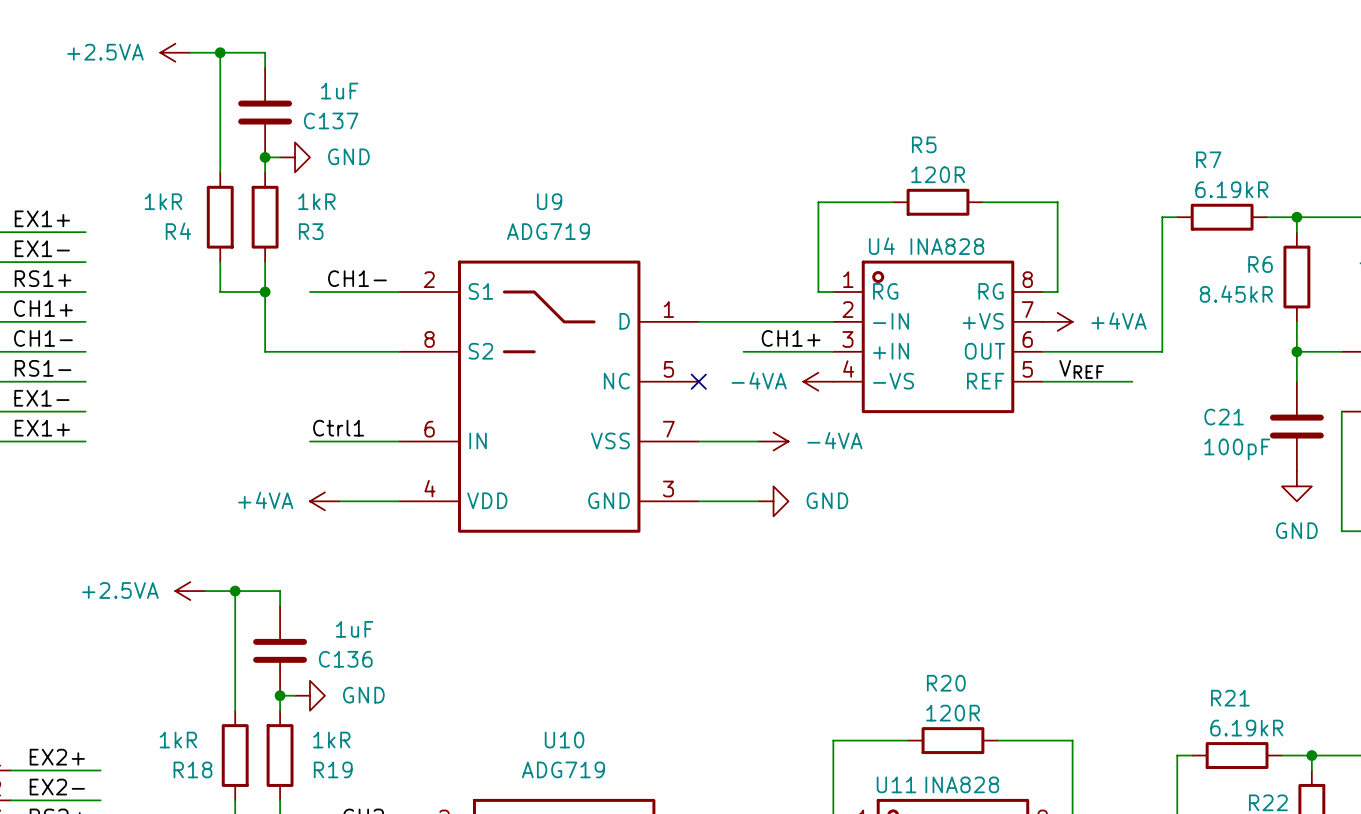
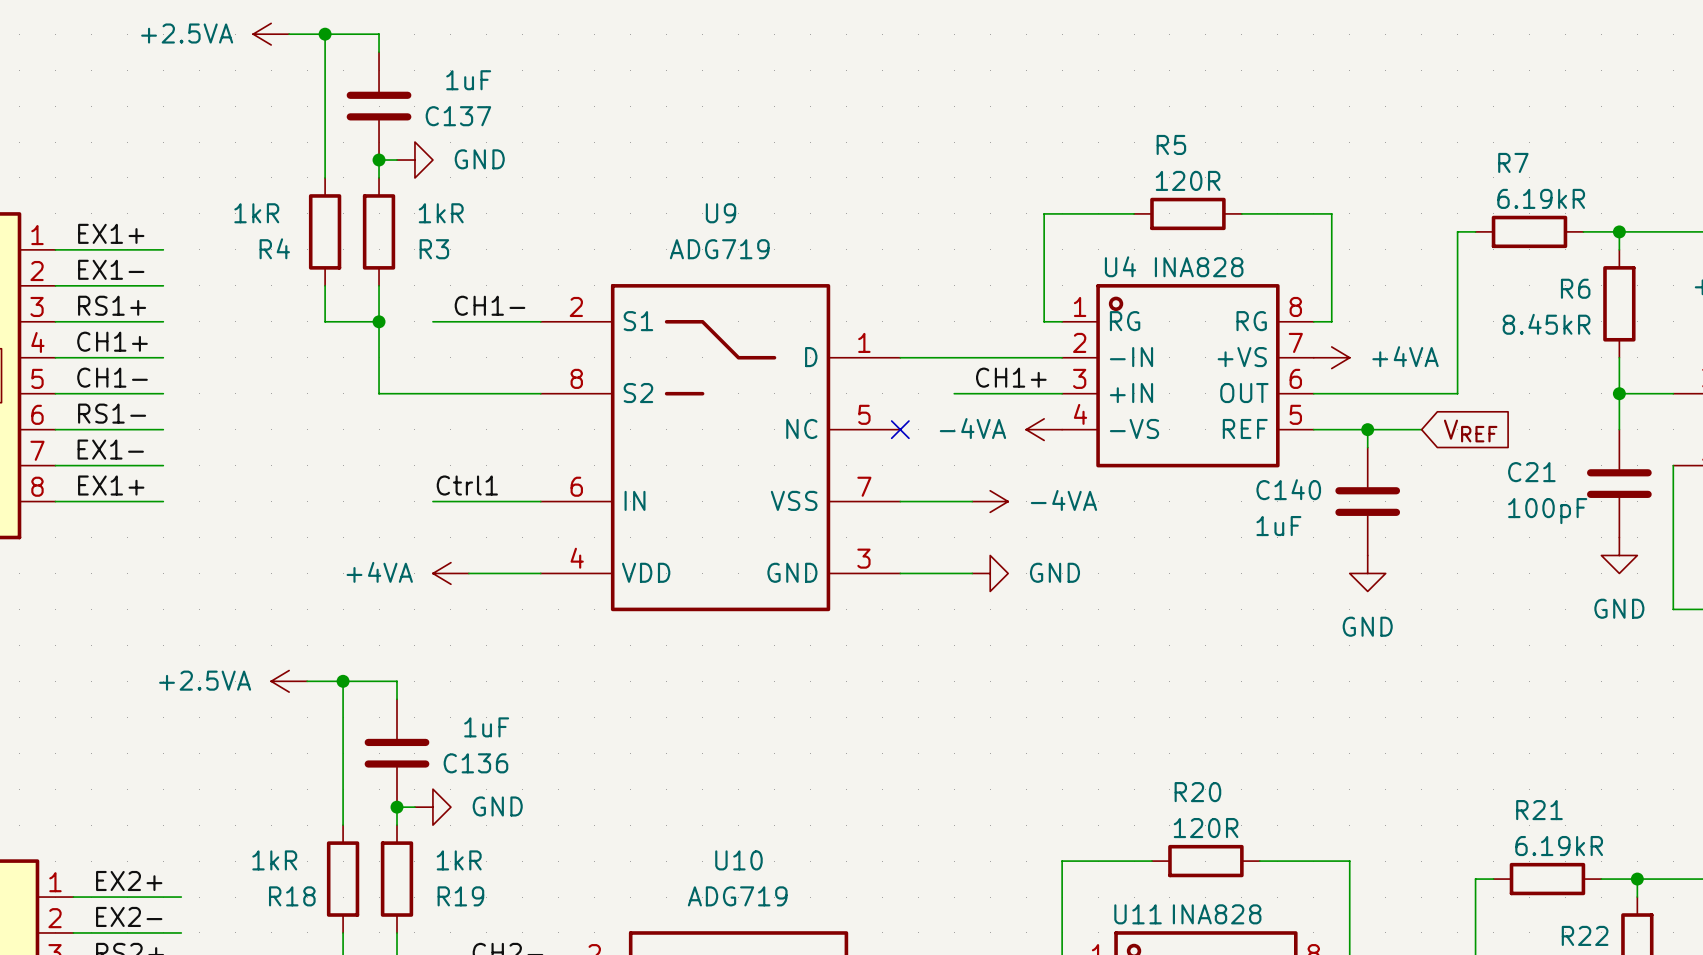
label: VREF (1081, 369) -> none
wire: none -> (1367, 429) (1367, 447)
junction: none -> (1367, 429)
global label: none -> VREF (1470, 431)
C140: none -> 1uF (1367, 501)
power symbol: none -> GND (1367, 573)

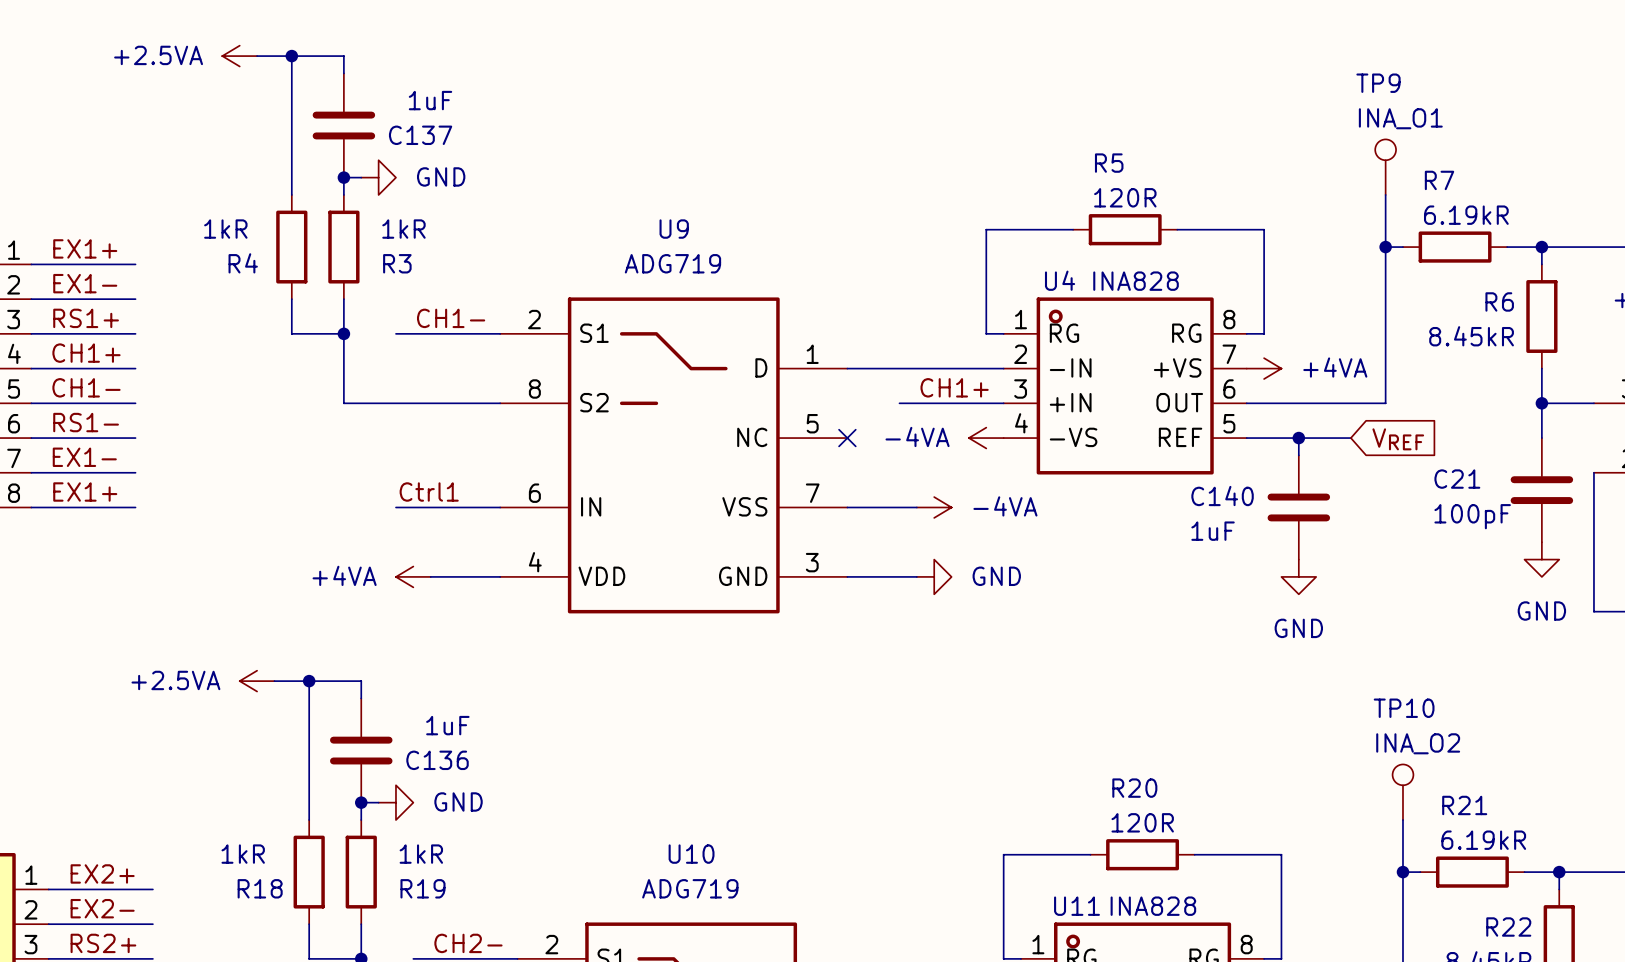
TP9: none -> INA_O1 (1385, 167)
wire: none -> (1385, 194) (1385, 247)
junction: none -> (1385, 247)
TP10: none -> INA_O2 (1402, 792)
wire: none -> (1402, 820) (1402, 872)
junction: none -> (1402, 872)

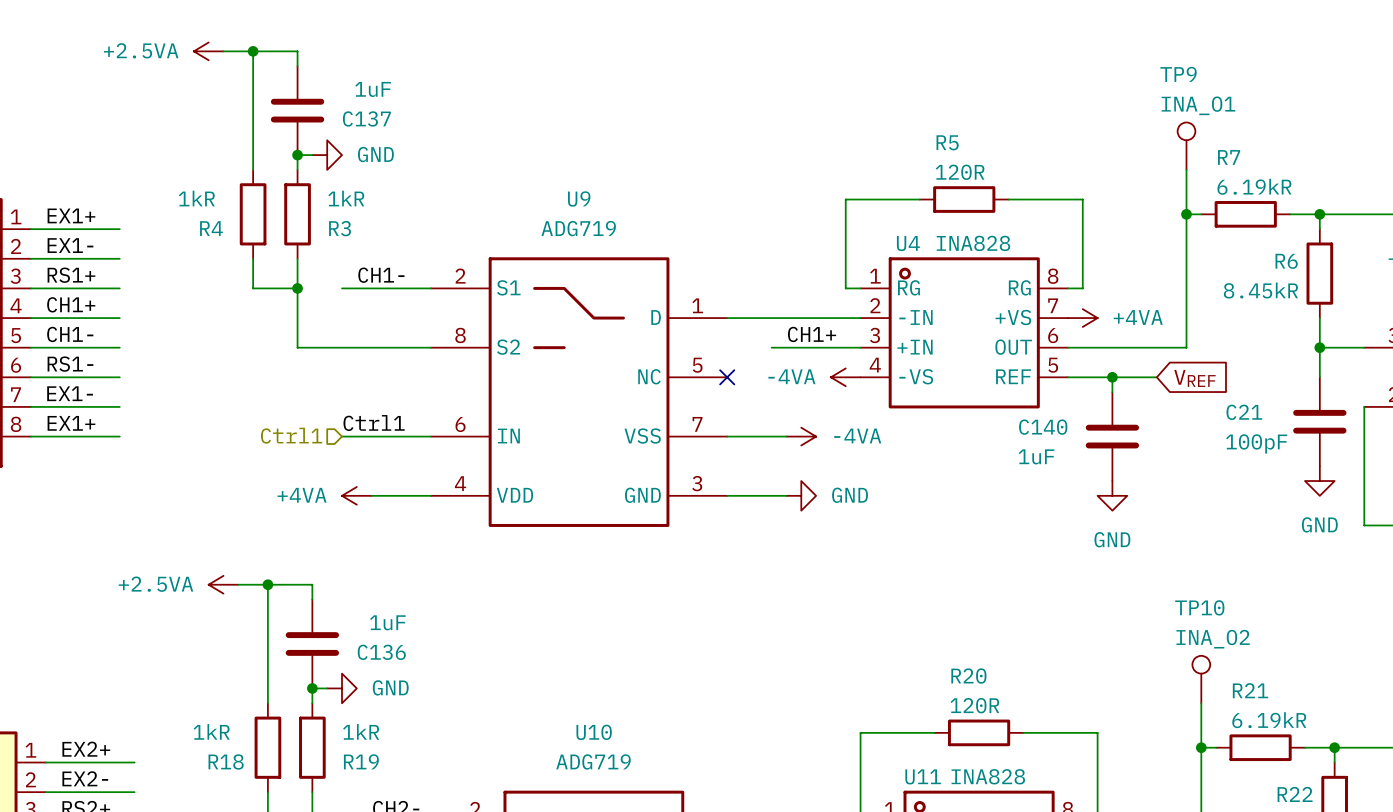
hierarchical label: none -> Ctrl1 (291, 435)

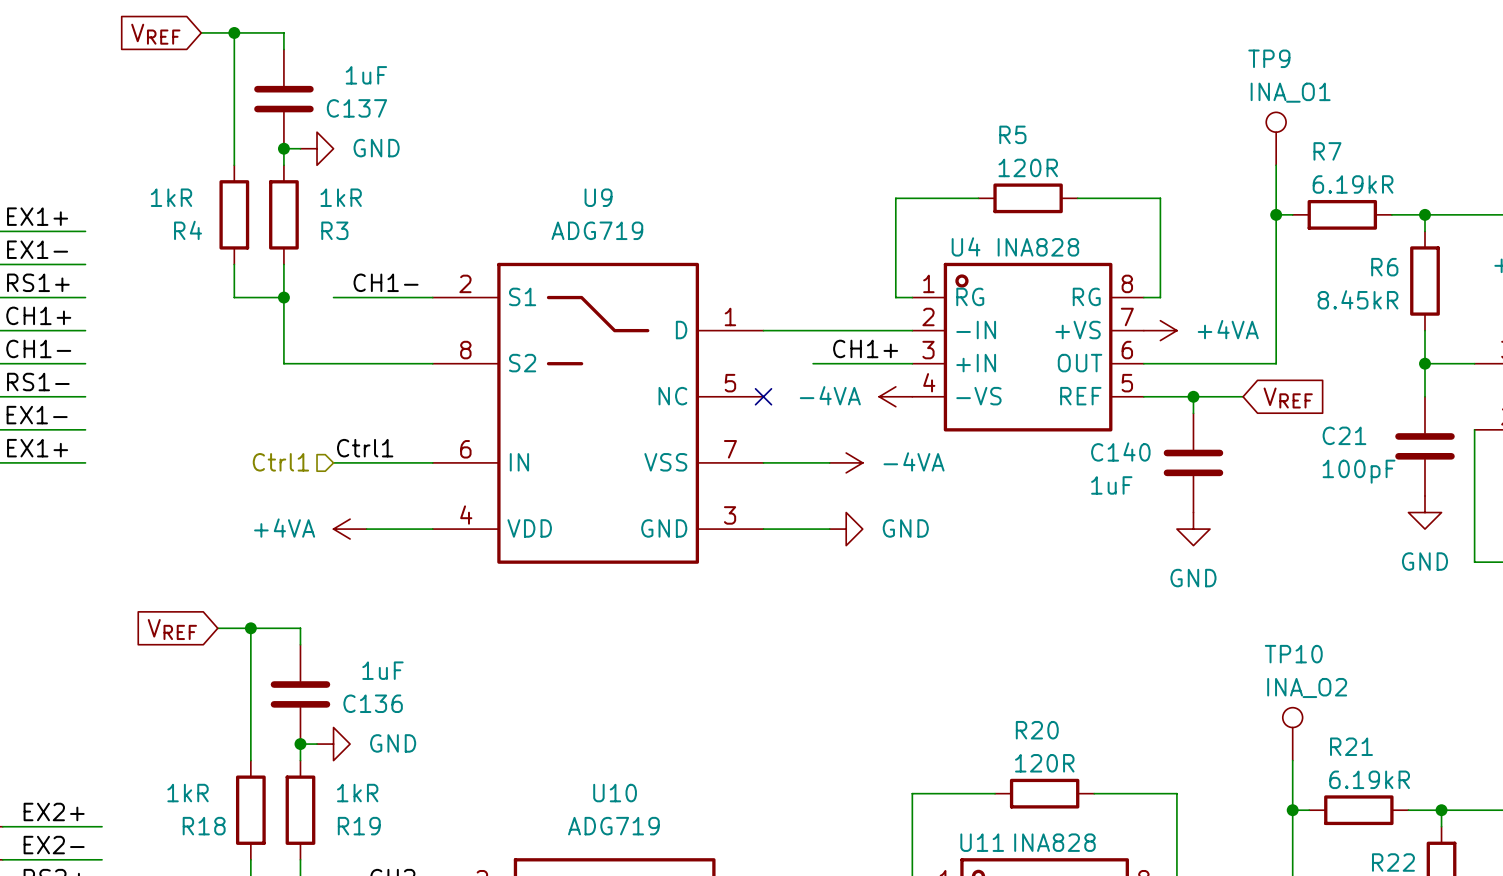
power symbol: +2.5VA (208, 51) -> none
global label: none -> VREF (155, 34)
power symbol: +2.5VA (223, 584) -> none
global label: none -> VREF (172, 629)

